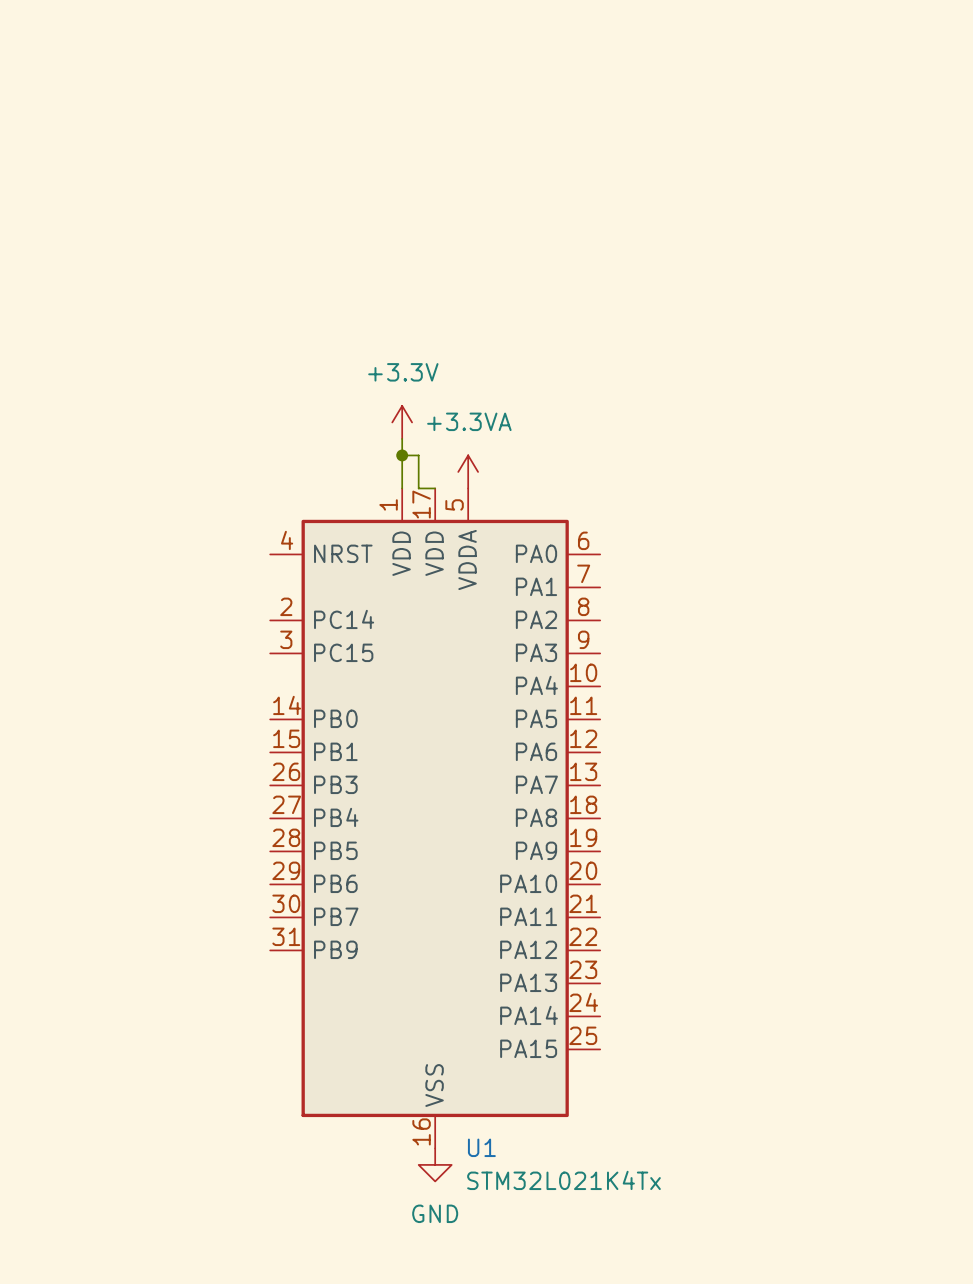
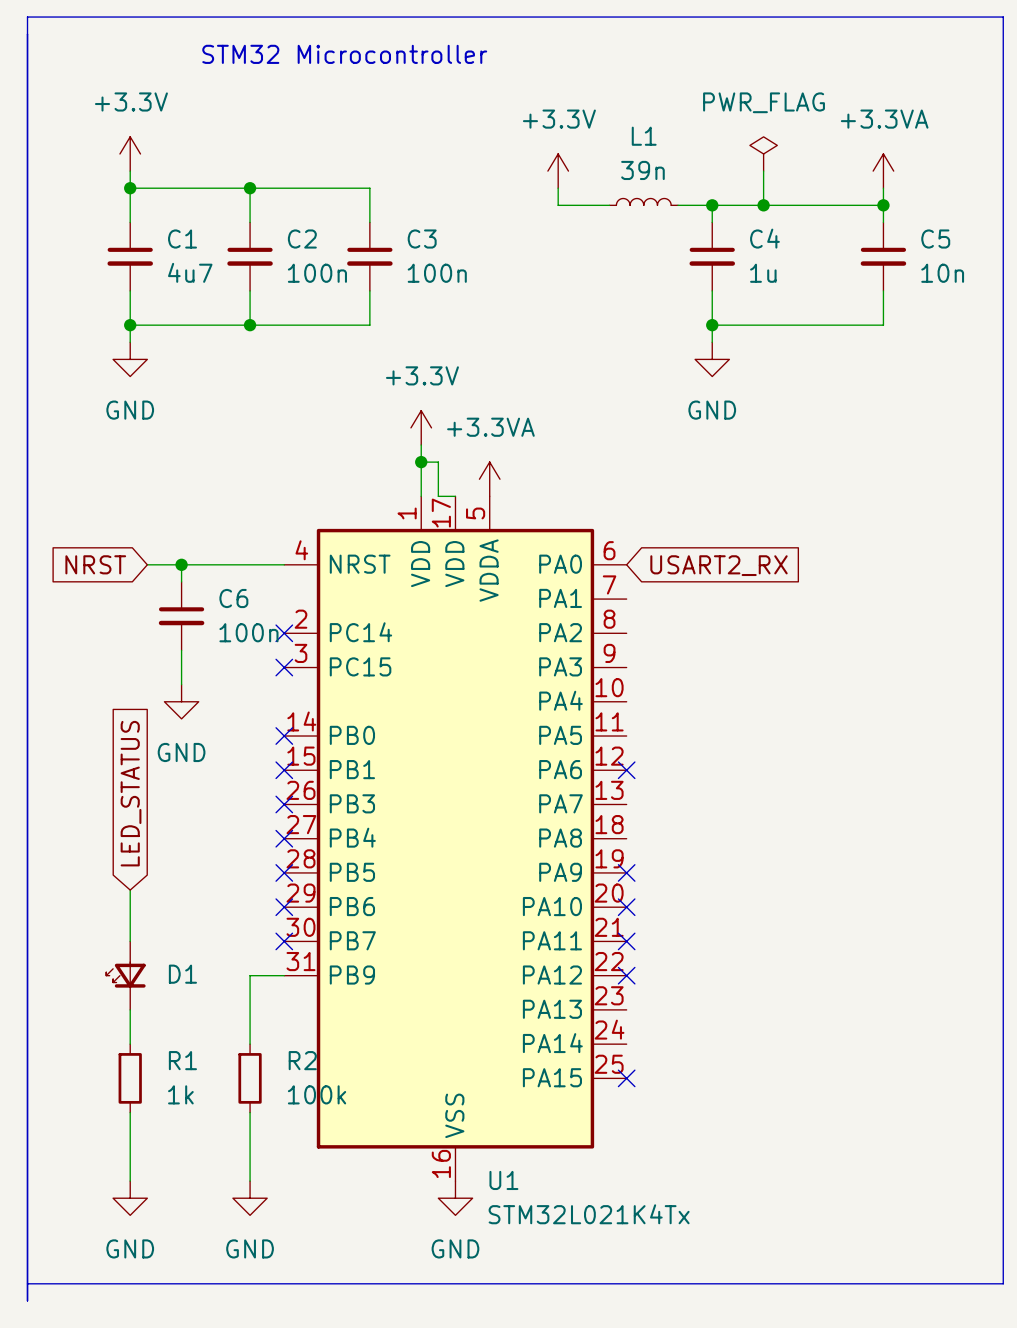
text: none -> STM32 Microcontroller (344, 54)
power symbol: none -> +3.3V (130, 153)
power symbol: none -> PWR_FLAG (763, 153)
wire: none -> (130, 171) (130, 222)
power symbol: none -> +3.3V (558, 171)
wire: none -> (763, 171) (763, 205)
power symbol: none -> +3.3VA (883, 171)
wire: none -> (130, 188) (369, 188) (369, 222)
junction: none -> (130, 188)
wire: none -> (250, 188) (250, 222)
junction: none -> (250, 188)
wire: none -> (558, 188) (558, 205) (609, 205)
wire: none -> (883, 188) (883, 222)
L1: none -> 39n (643, 201)
wire: none -> (678, 205) (883, 205)
wire: none -> (712, 205) (712, 222)
junction: none -> (712, 205)
junction: none -> (763, 205)
junction: none -> (883, 205)
C1: none -> 4u7 (130, 256)
C2: none -> 100n (250, 256)
C3: none -> 100n (369, 256)
C4: none -> 1u (712, 256)
C5: none -> 10n (883, 256)
wire: none -> (130, 290) (130, 342)
wire: none -> (250, 290) (250, 325)
wire: none -> (369, 290) (369, 325) (130, 325)
wire: none -> (712, 290) (712, 342)
wire: none -> (883, 290) (883, 325) (712, 325)
junction: none -> (130, 325)
junction: none -> (250, 325)
junction: none -> (712, 325)
power symbol: none -> GND (130, 359)
power symbol: none -> GND (712, 359)
global label: none -> NRST (95, 564)
wire: none -> (147, 564) (284, 564)
wire: none -> (181, 564) (181, 581)
junction: none -> (181, 564)
global label: none -> USART2_RX (719, 565)
C6: none -> 100n (181, 616)
no-connect mark: none -> (284, 633)
wire: none -> (181, 650) (181, 684)
no-connect mark: none -> (284, 667)
power symbol: none -> GND (181, 701)
no-connect mark: none -> (284, 736)
no-connect mark: none -> (284, 770)
no-connect mark: none -> (626, 770)
global label: none -> LED_STATUS (131, 793)
no-connect mark: none -> (284, 804)
no-connect mark: none -> (284, 838)
no-connect mark: none -> (284, 872)
no-connect mark: none -> (626, 872)
wire: none -> (130, 890) (130, 941)
no-connect mark: none -> (284, 907)
no-connect mark: none -> (626, 907)
no-connect mark: none -> (284, 941)
no-connect mark: none -> (626, 941)
D1: none -> (125, 975)
wire: none -> (284, 975) (250, 975) (250, 1044)
no-connect mark: none -> (626, 975)
wire: none -> (130, 1009) (130, 1044)
R1: none -> 1k (130, 1078)
R2: none -> 100k (250, 1078)
no-connect mark: none -> (626, 1078)
wire: none -> (130, 1112) (130, 1181)
wire: none -> (250, 1112) (250, 1181)
power symbol: none -> GND (130, 1198)
power symbol: none -> GND (250, 1198)
line: none -> (27, 1283) (1003, 1283) (1003, 17) (27, 17) (27, 1300)

